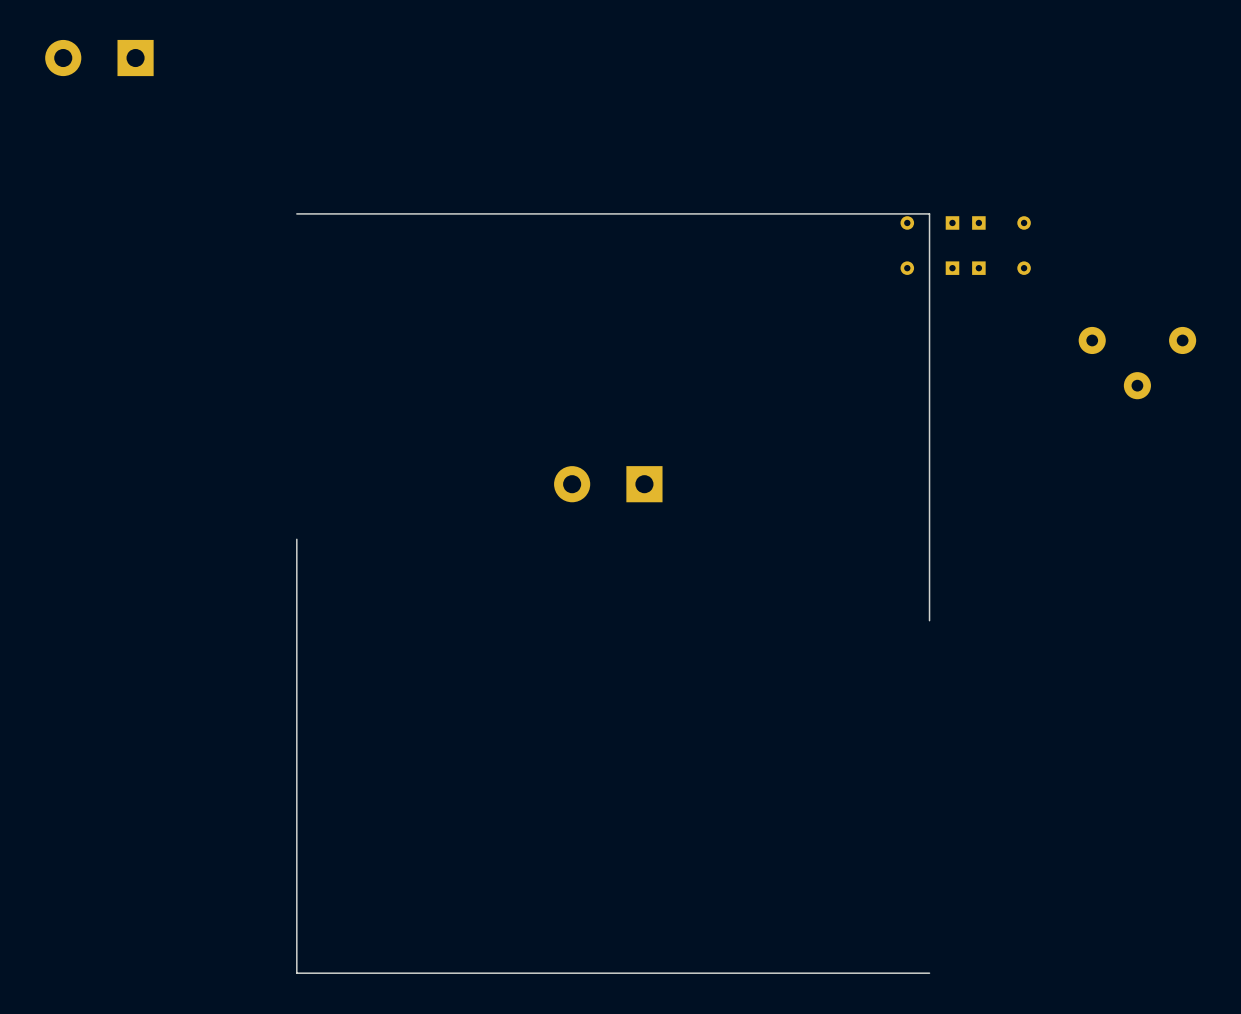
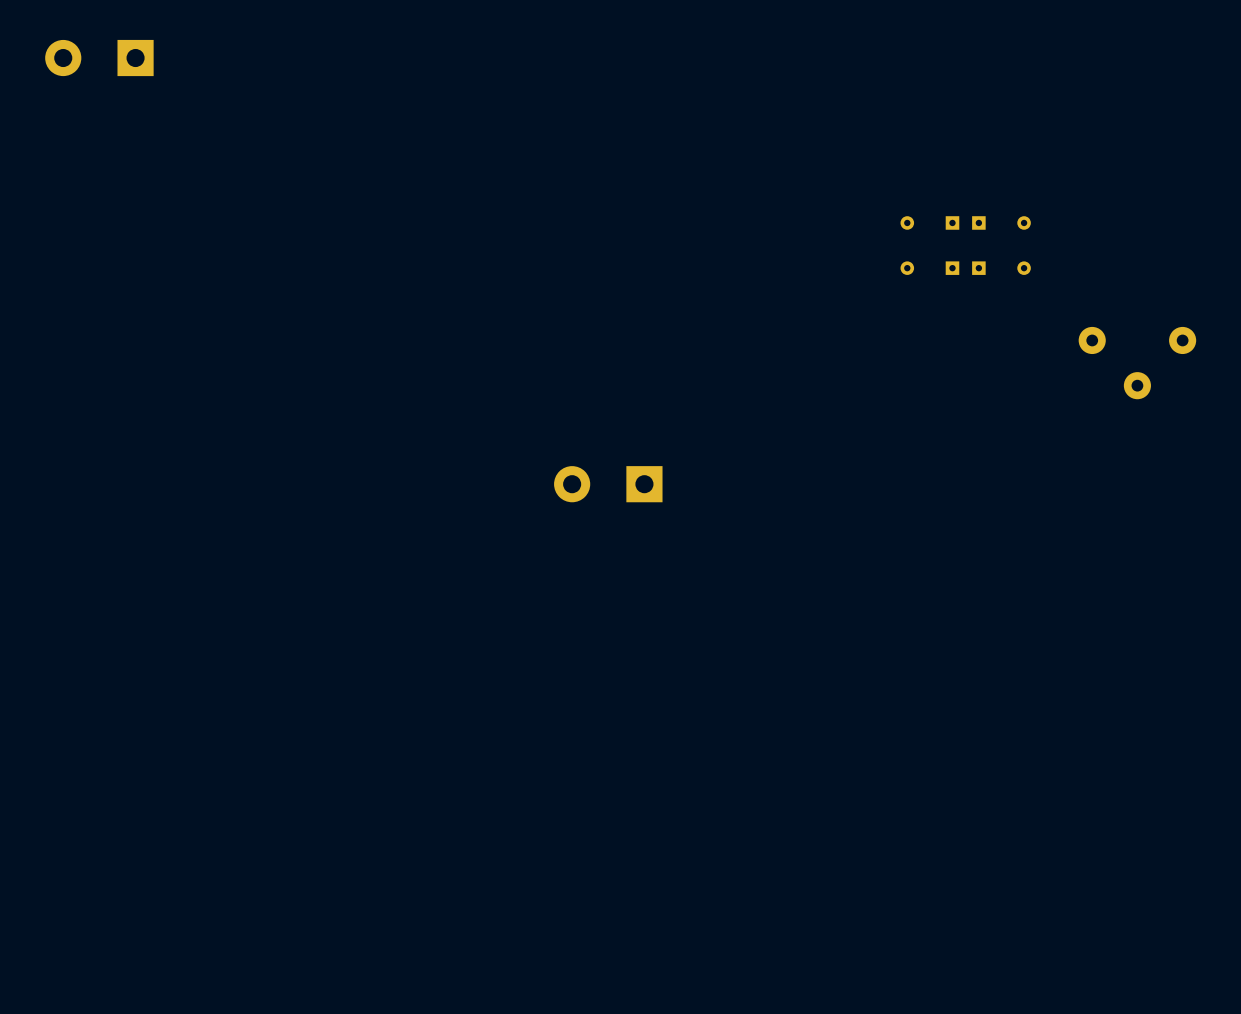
board edge: (296, 213) (929, 213) (929, 620) -> none
board edge: (296, 539) (296, 973) (929, 973) -> none

